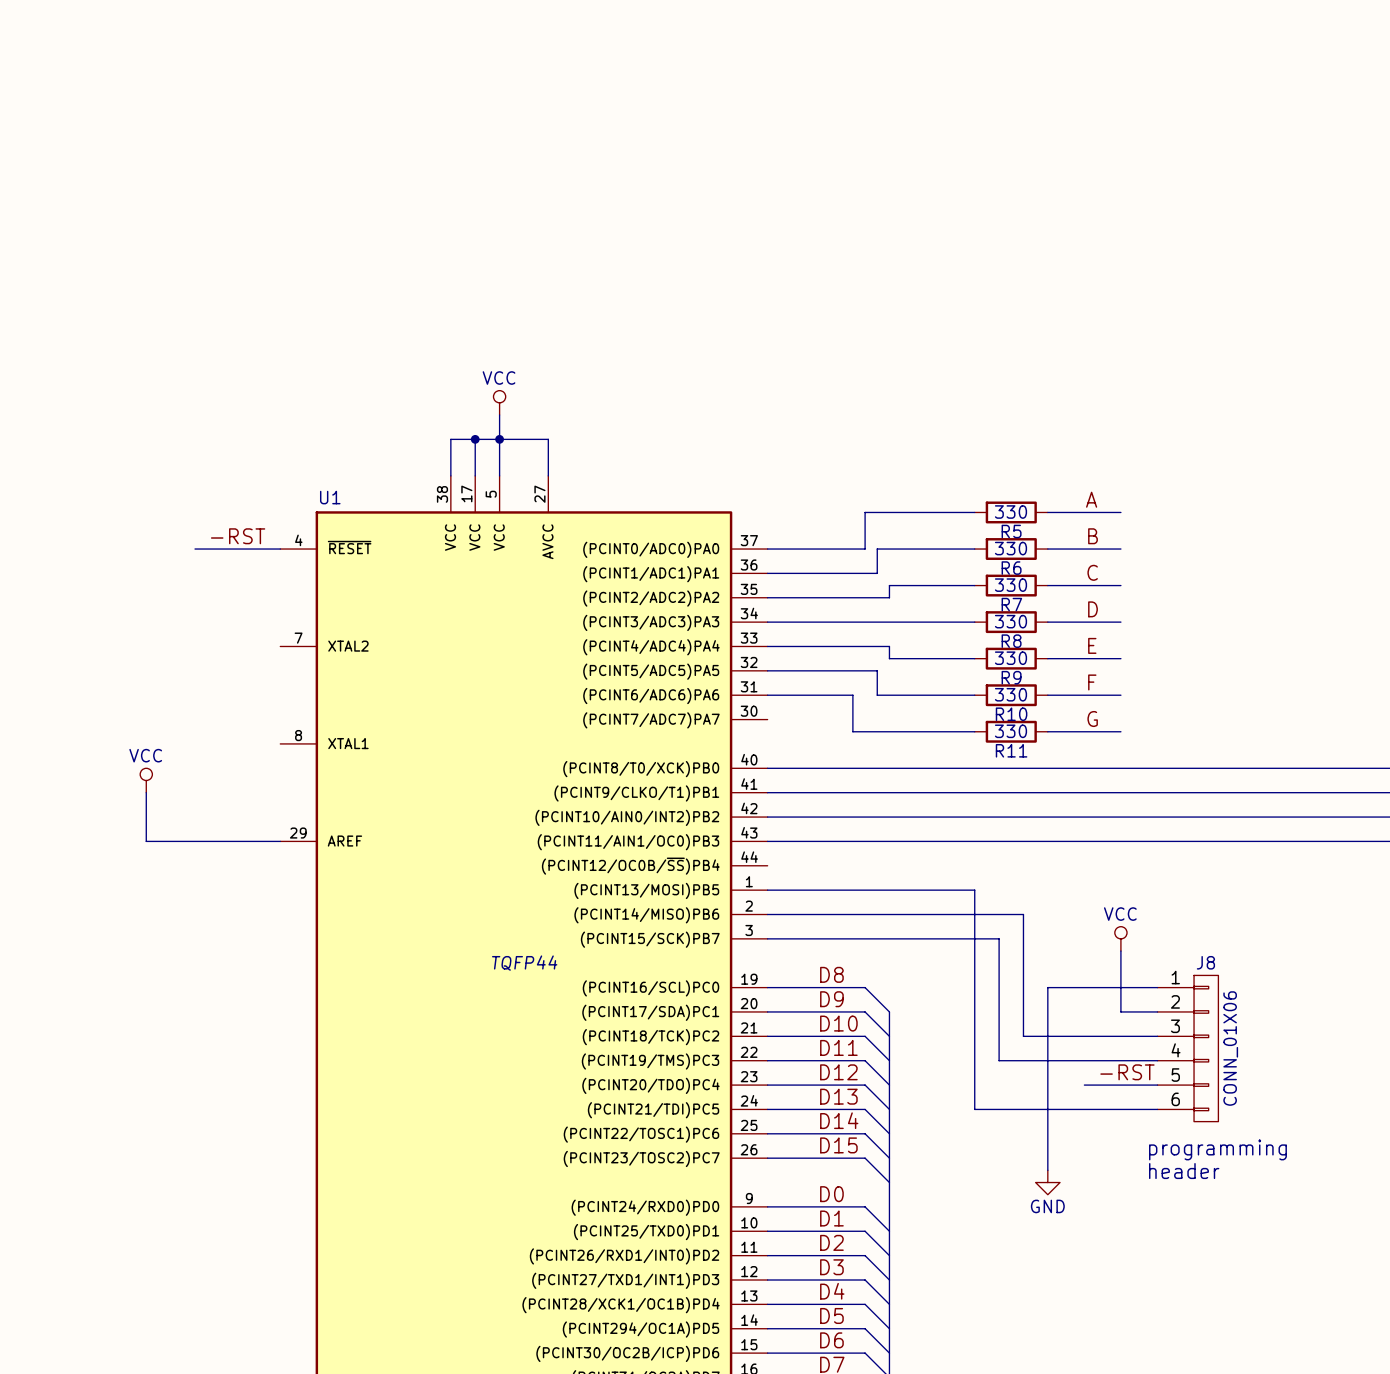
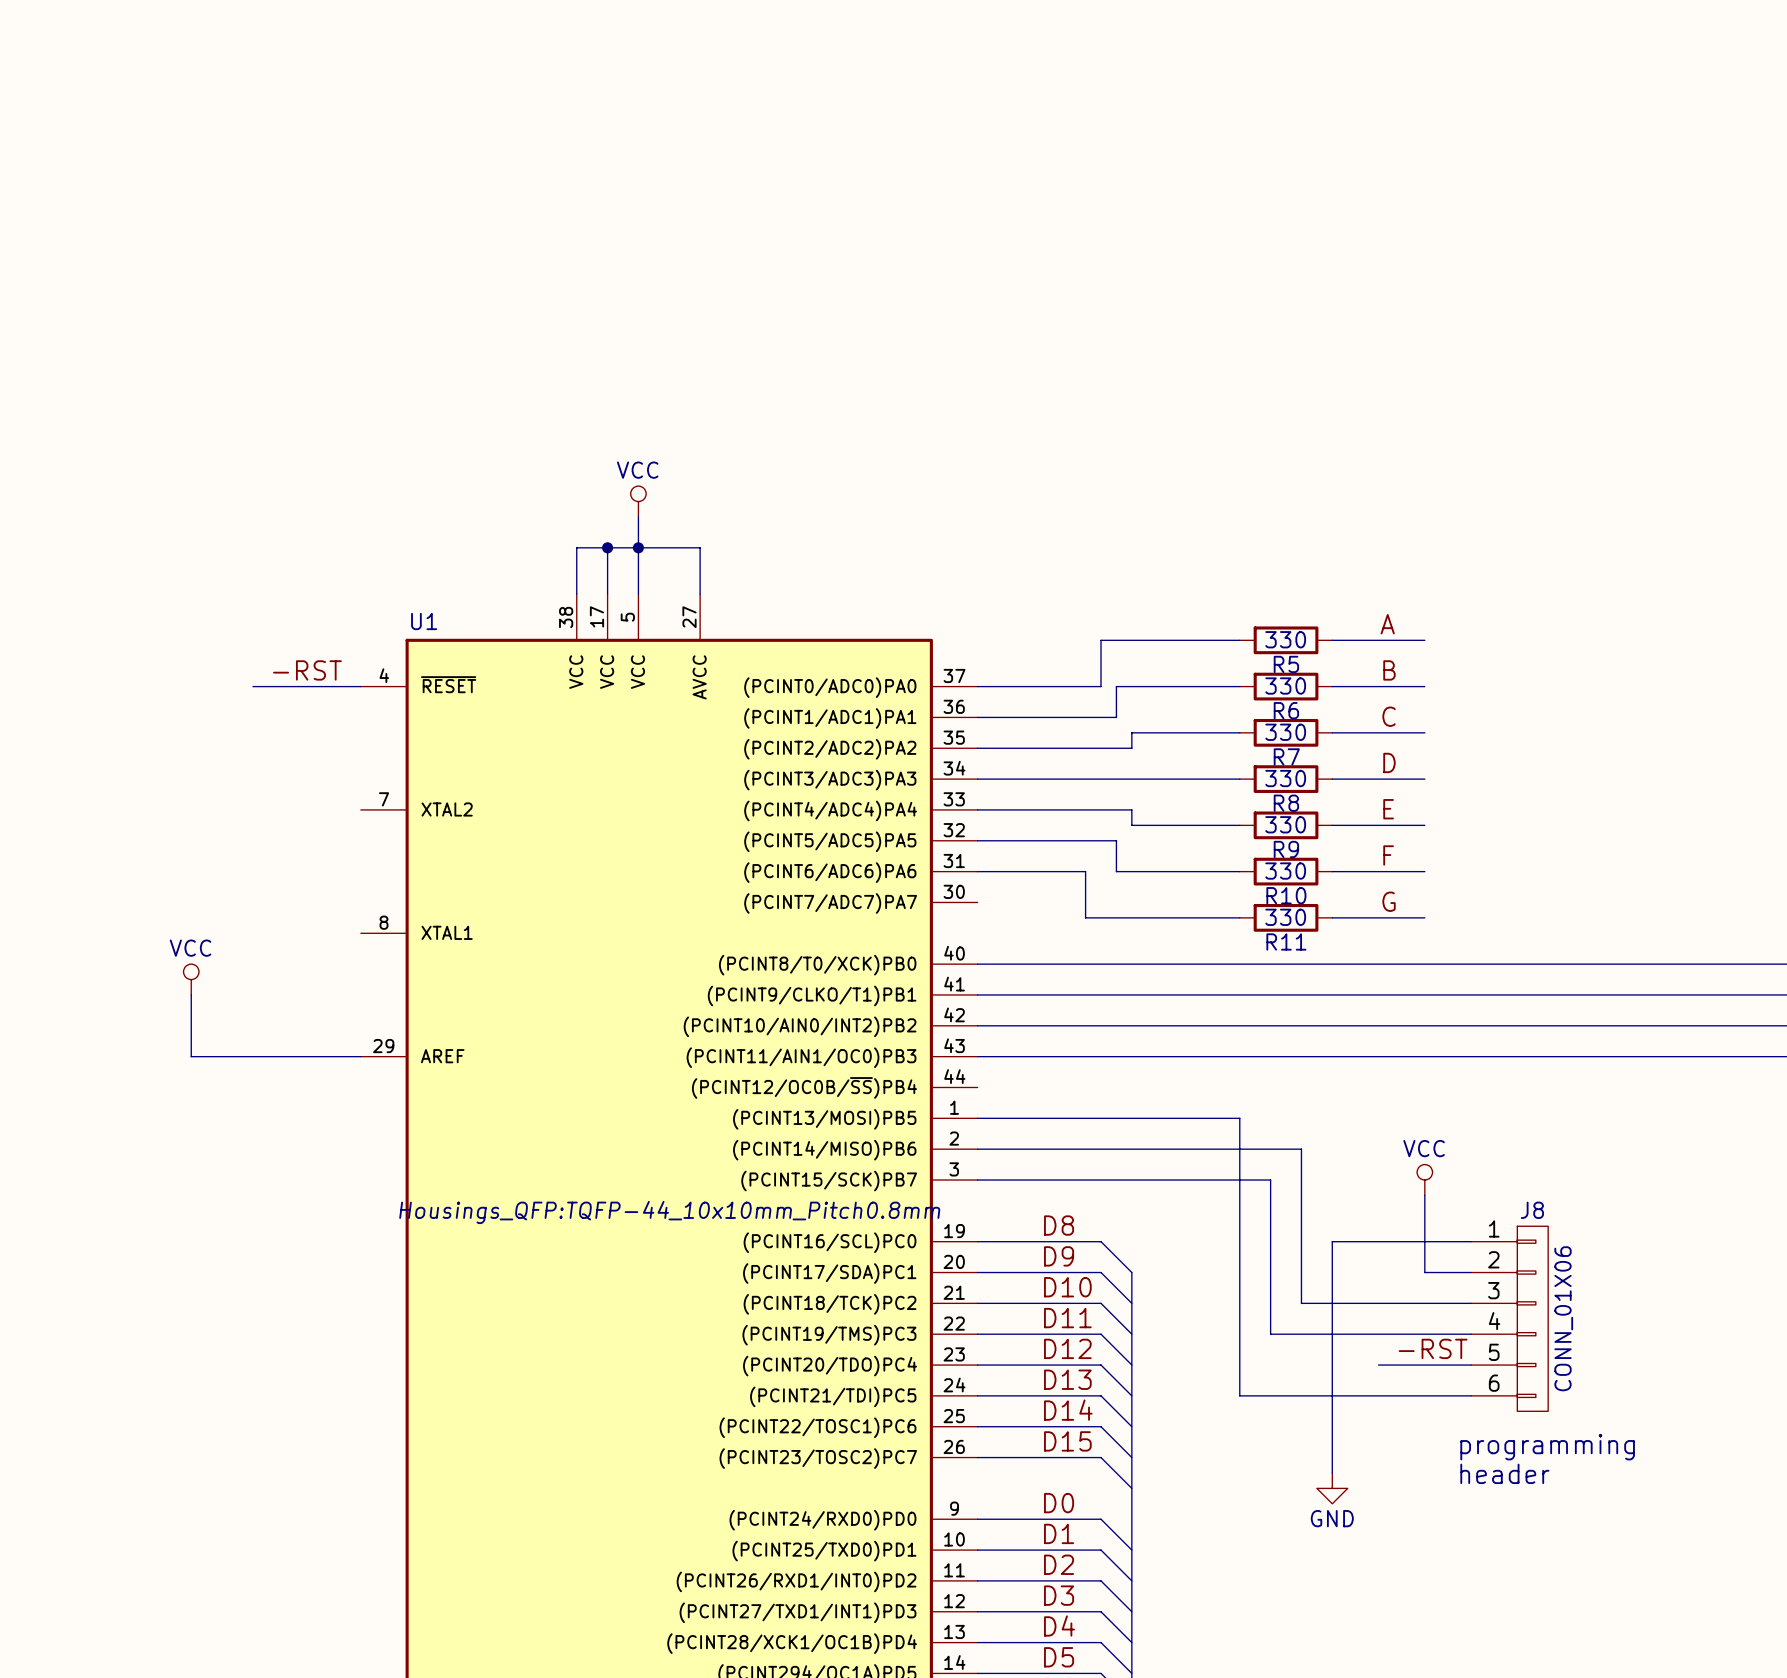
U1 text: TQFP44 (524, 963) -> Housings_QFP:TQFP-44_10x10mm_Pitch0.8mm (669, 1212)

